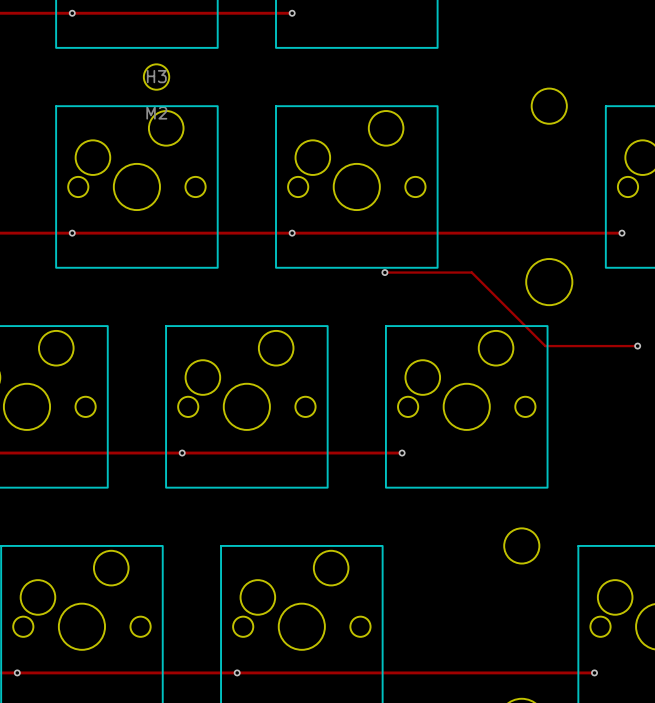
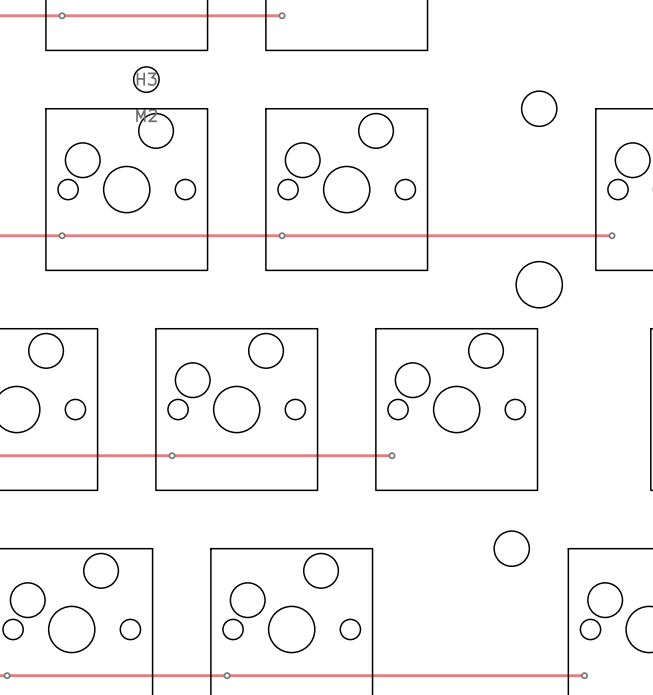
track: (384, 272) (471, 272) (545, 346) (637, 346) -> none
via: (384, 272) -> none
via: (637, 346) -> none

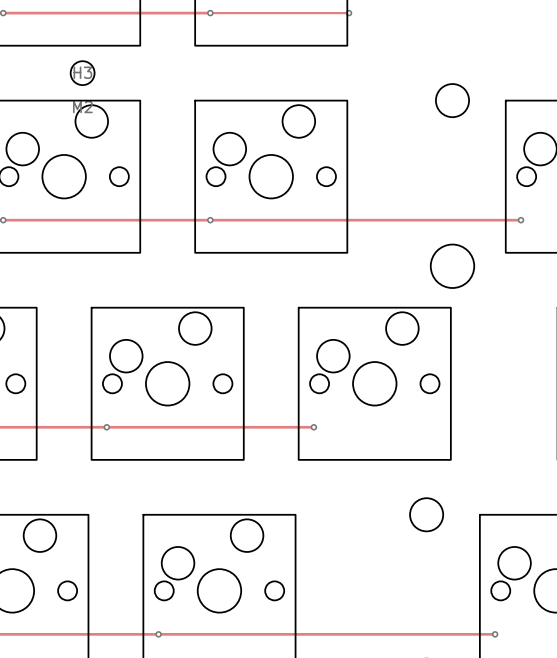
track: none -> (210, 13) (348, 13)
via: none -> (348, 13)

